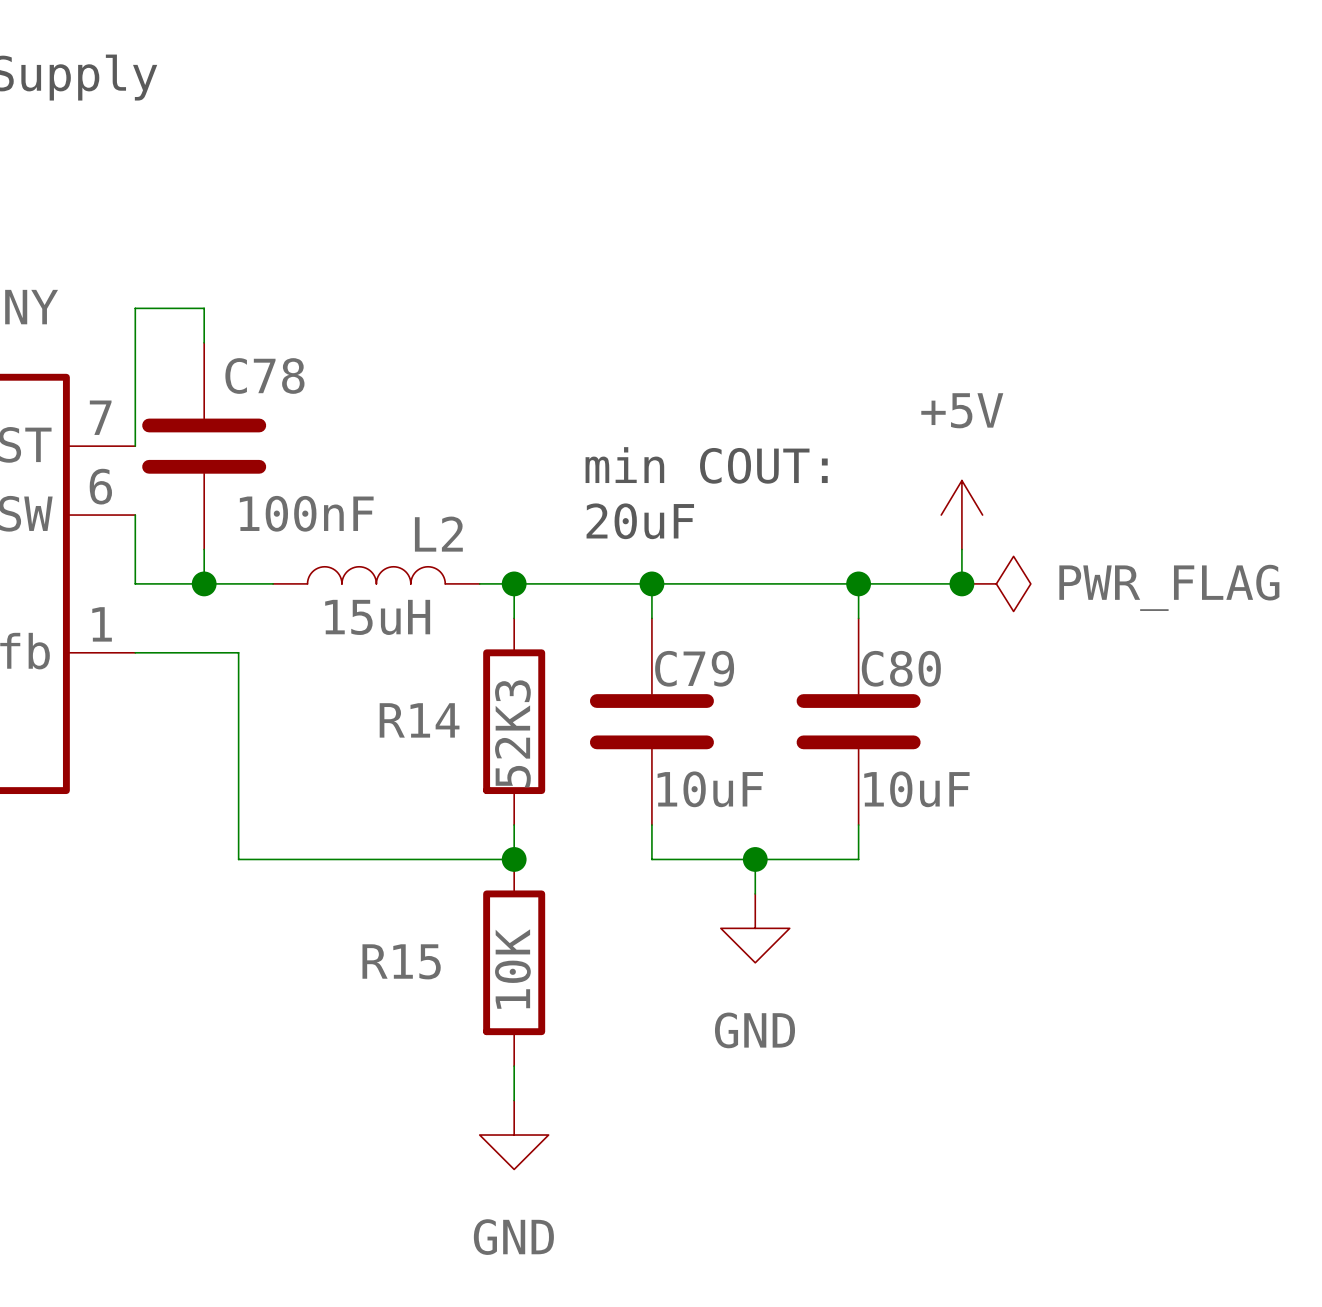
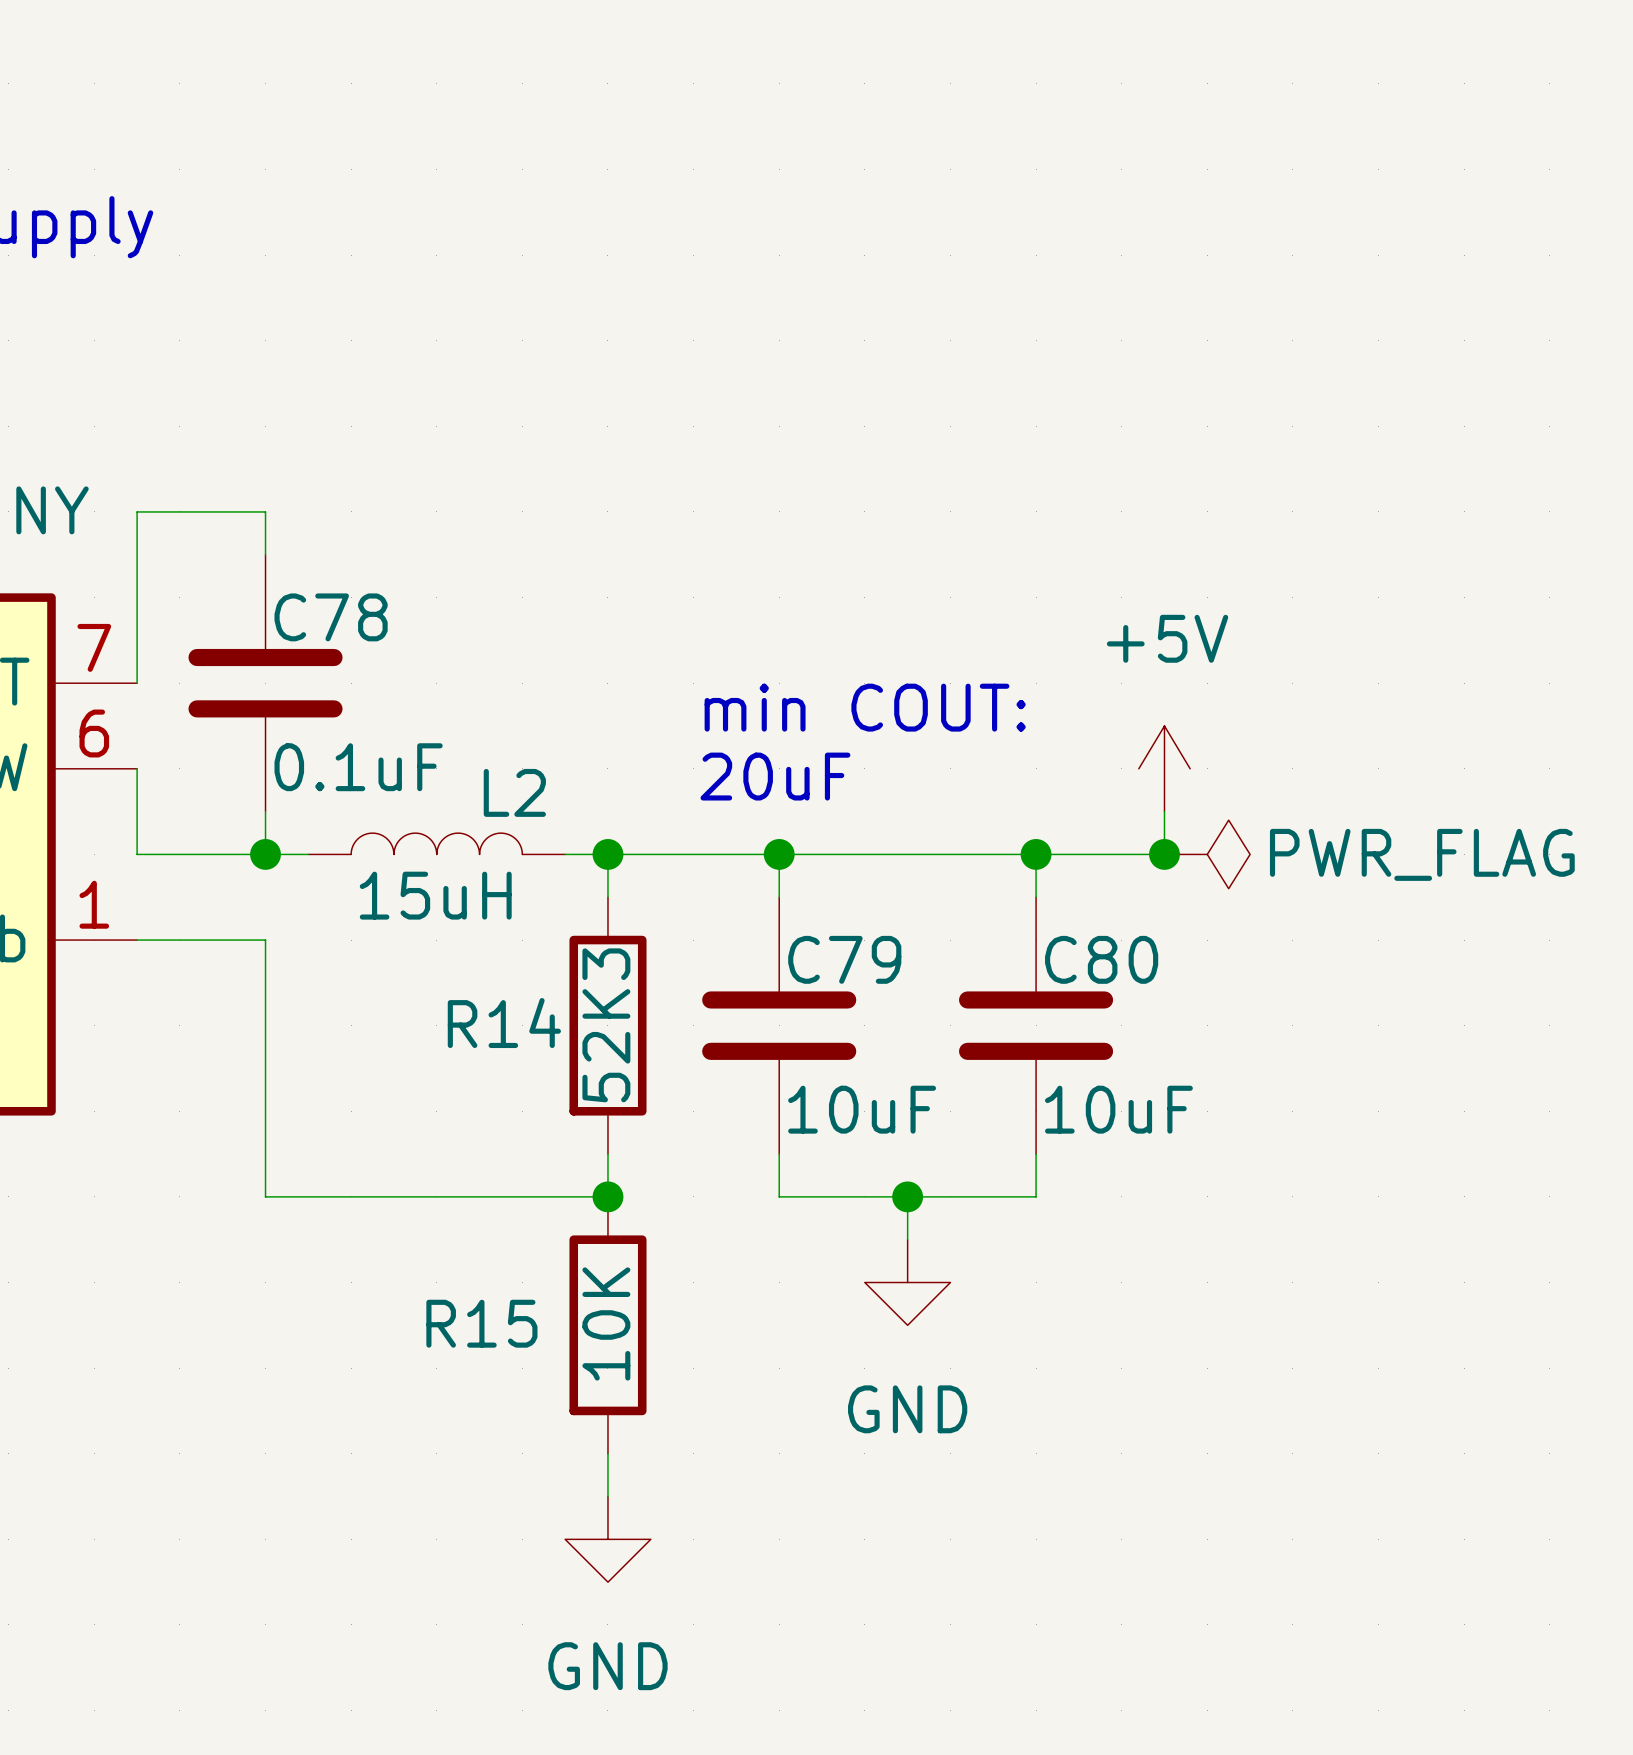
wire: (204, 308) (204, 342) -> (222, 511) (265, 511) (265, 554)
C78 name position: C78 (264, 376) -> C78 (331, 617)
C78 position: (204, 446) -> (265, 683)
C78 value: 100nF (306, 513) -> 0.1uF (358, 767)
wire: (204, 549) (204, 583) -> (265, 811) (265, 854)
junction position: (204, 583) -> (265, 854)

